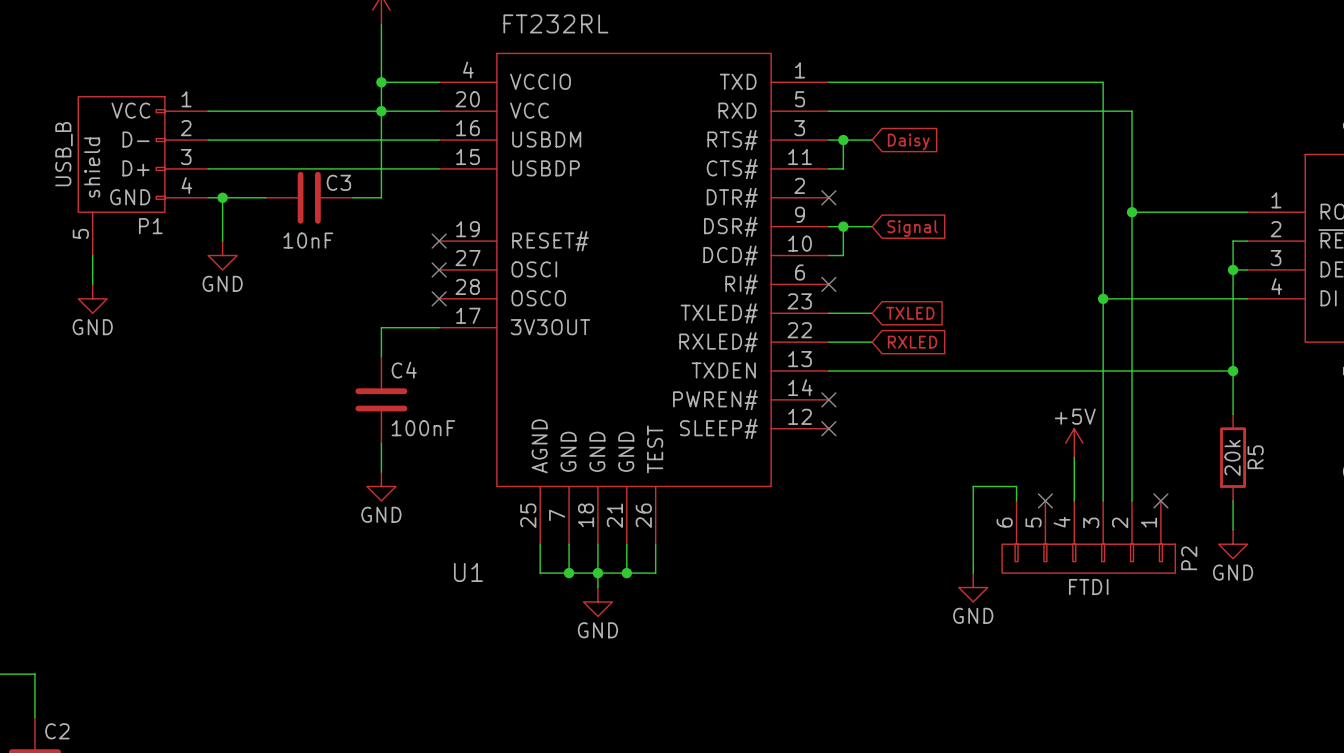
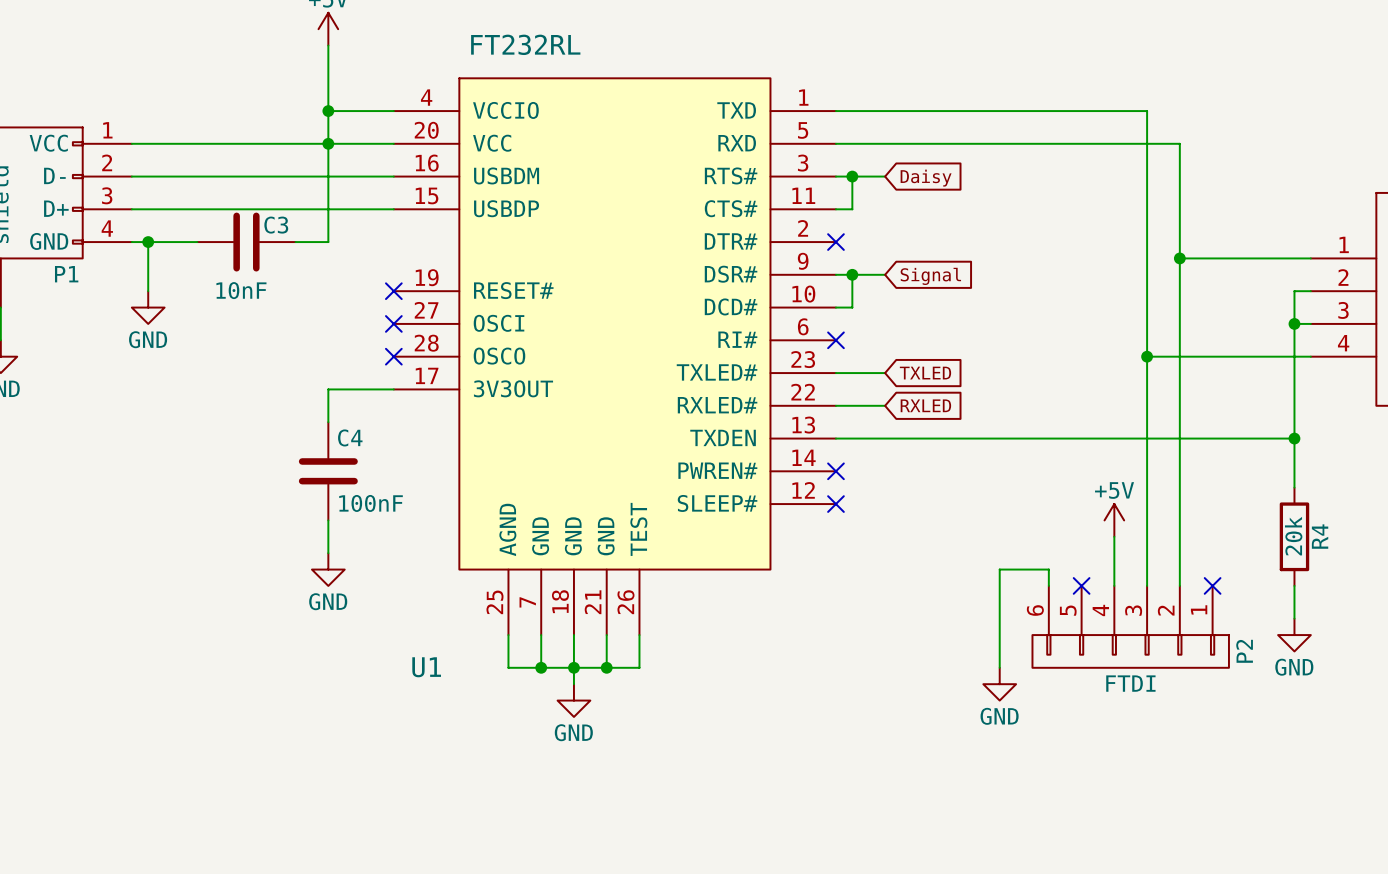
R5 name: R5 (1255, 457) -> R4 (1320, 536)

